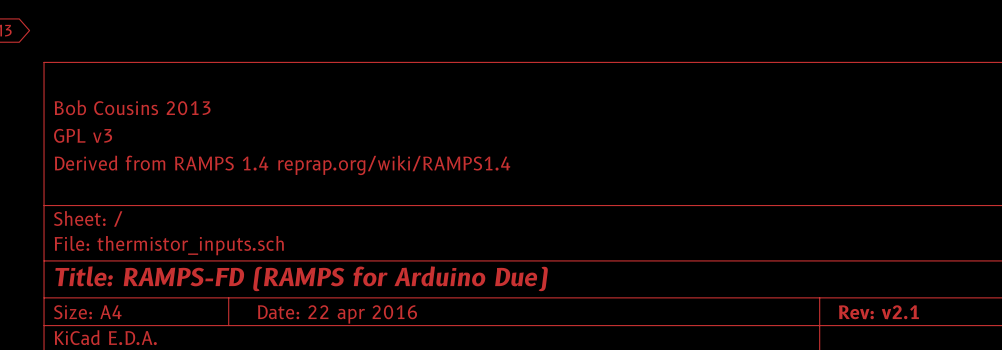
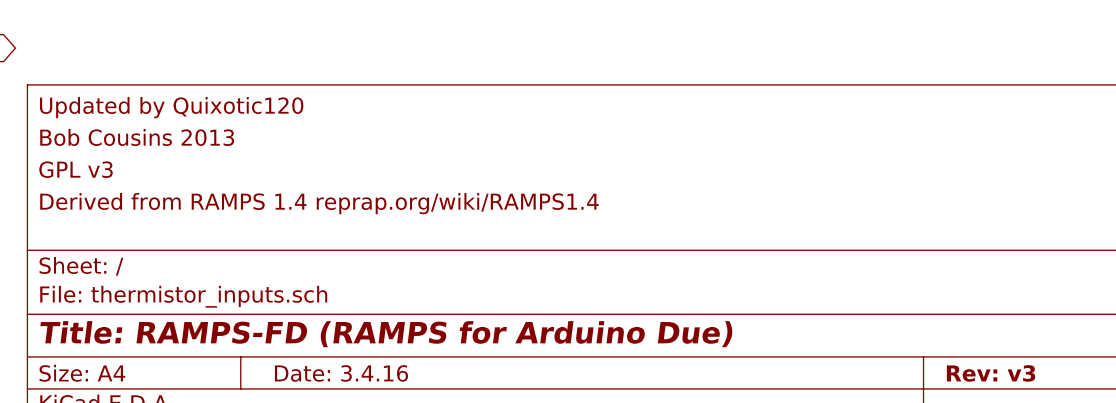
title block: none -> Updated by Quixotic120 (171, 107)
title block: Rev: v2.1 (878, 312) -> Rev: v3 (991, 373)
title block: Date: 22 apr 2016 (337, 314) -> Date: 3.4.16 (341, 373)

